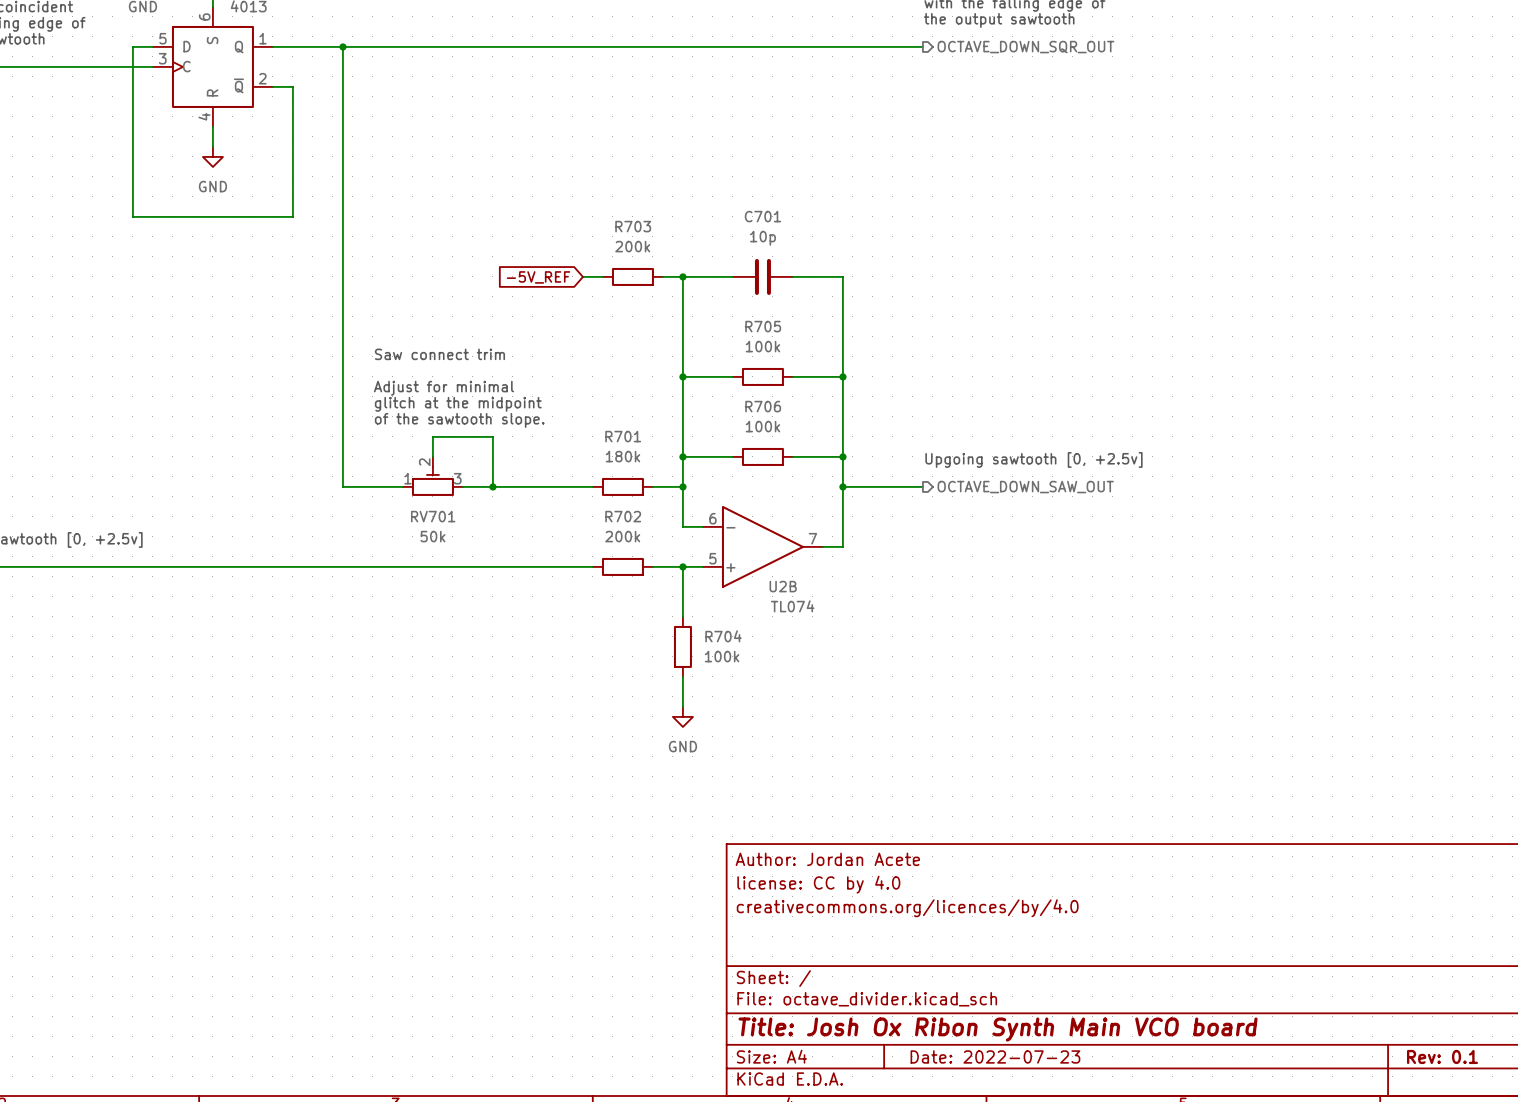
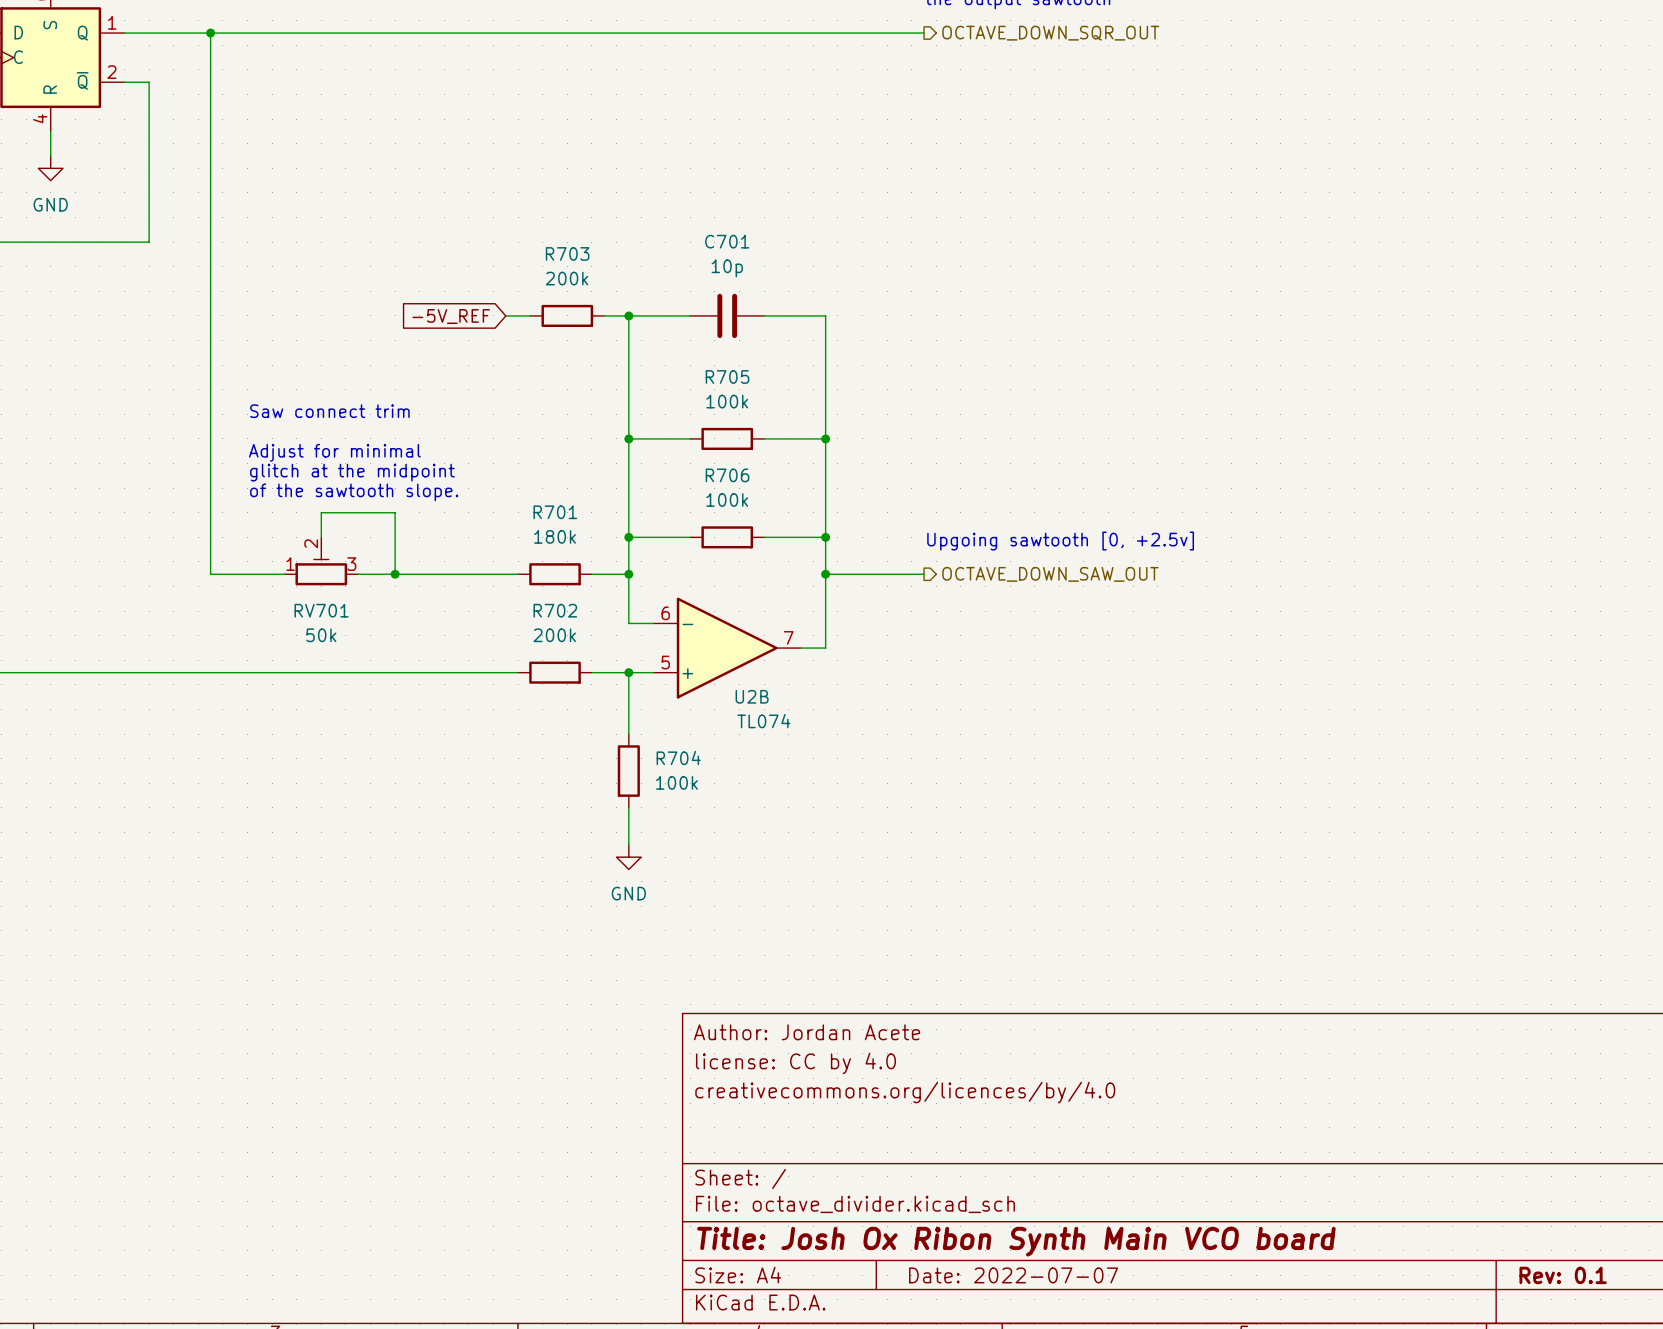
title block: Date: 2022-07-23 (995, 1056) -> Date: 2022-07-07 (1013, 1275)

